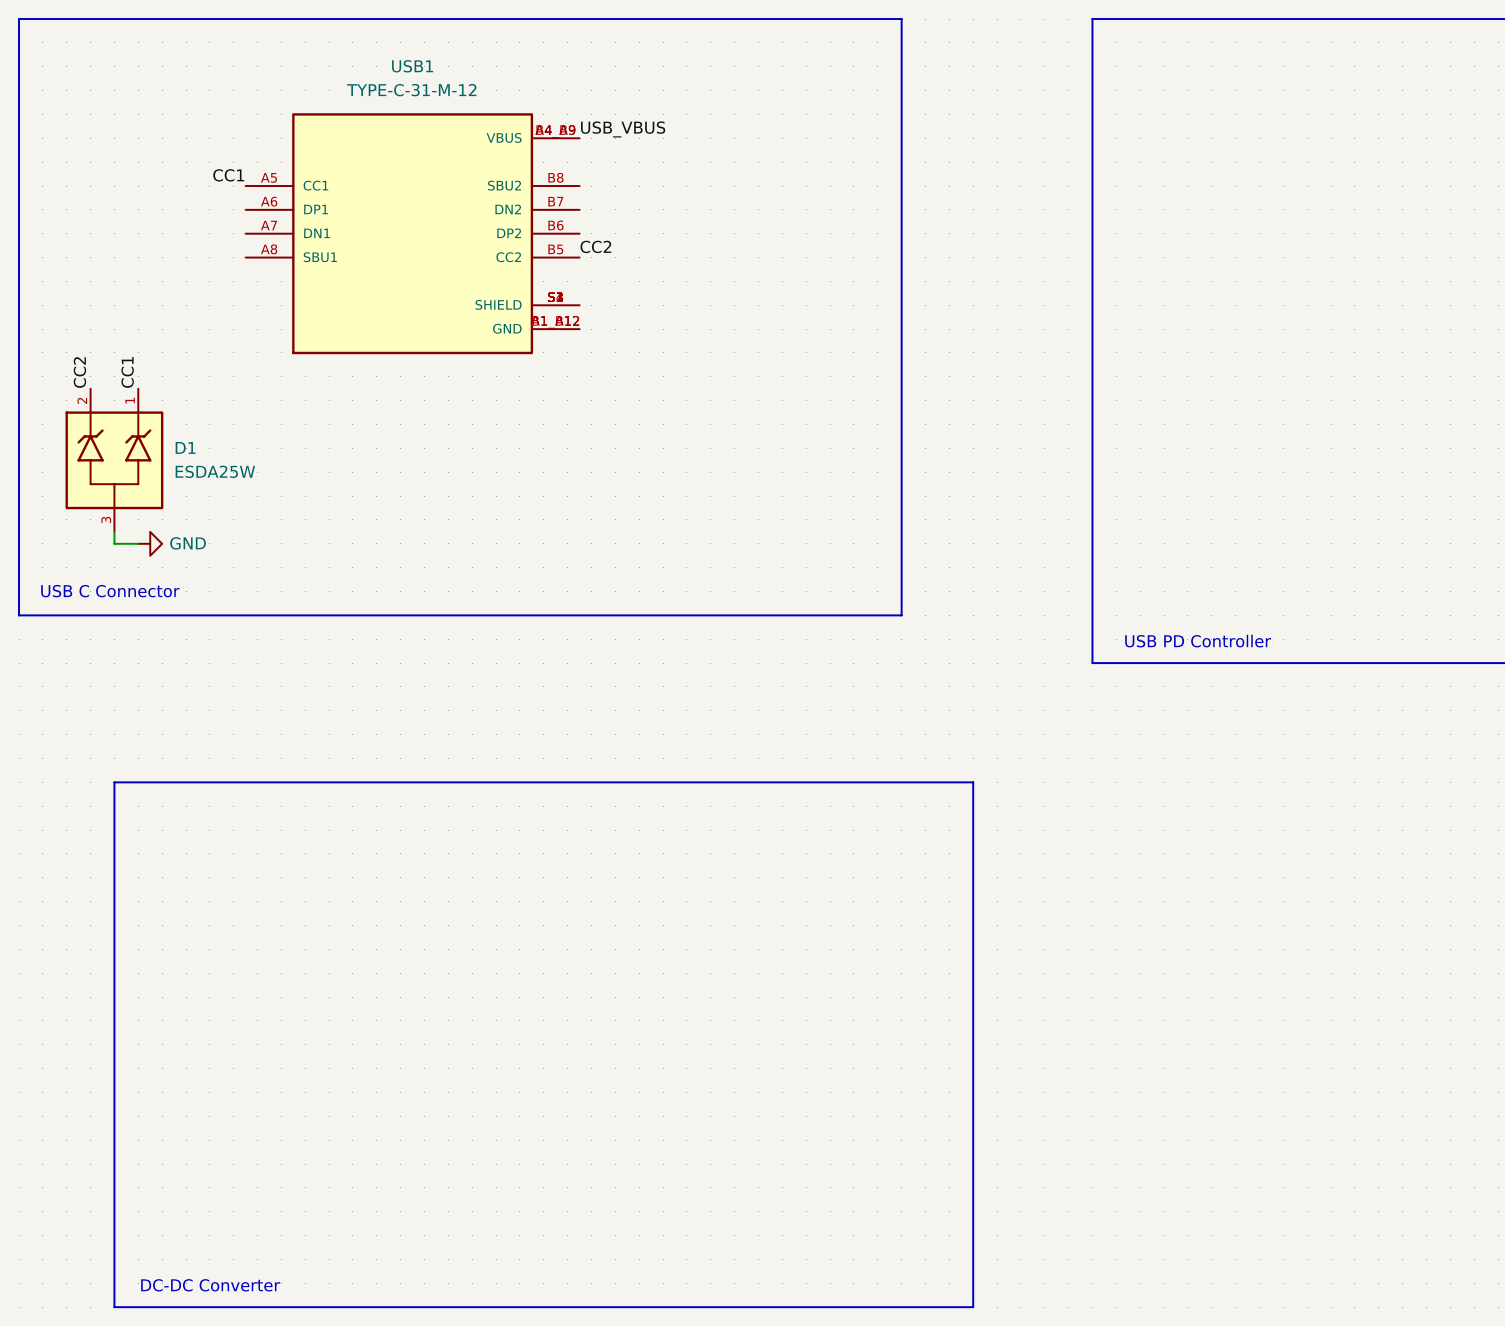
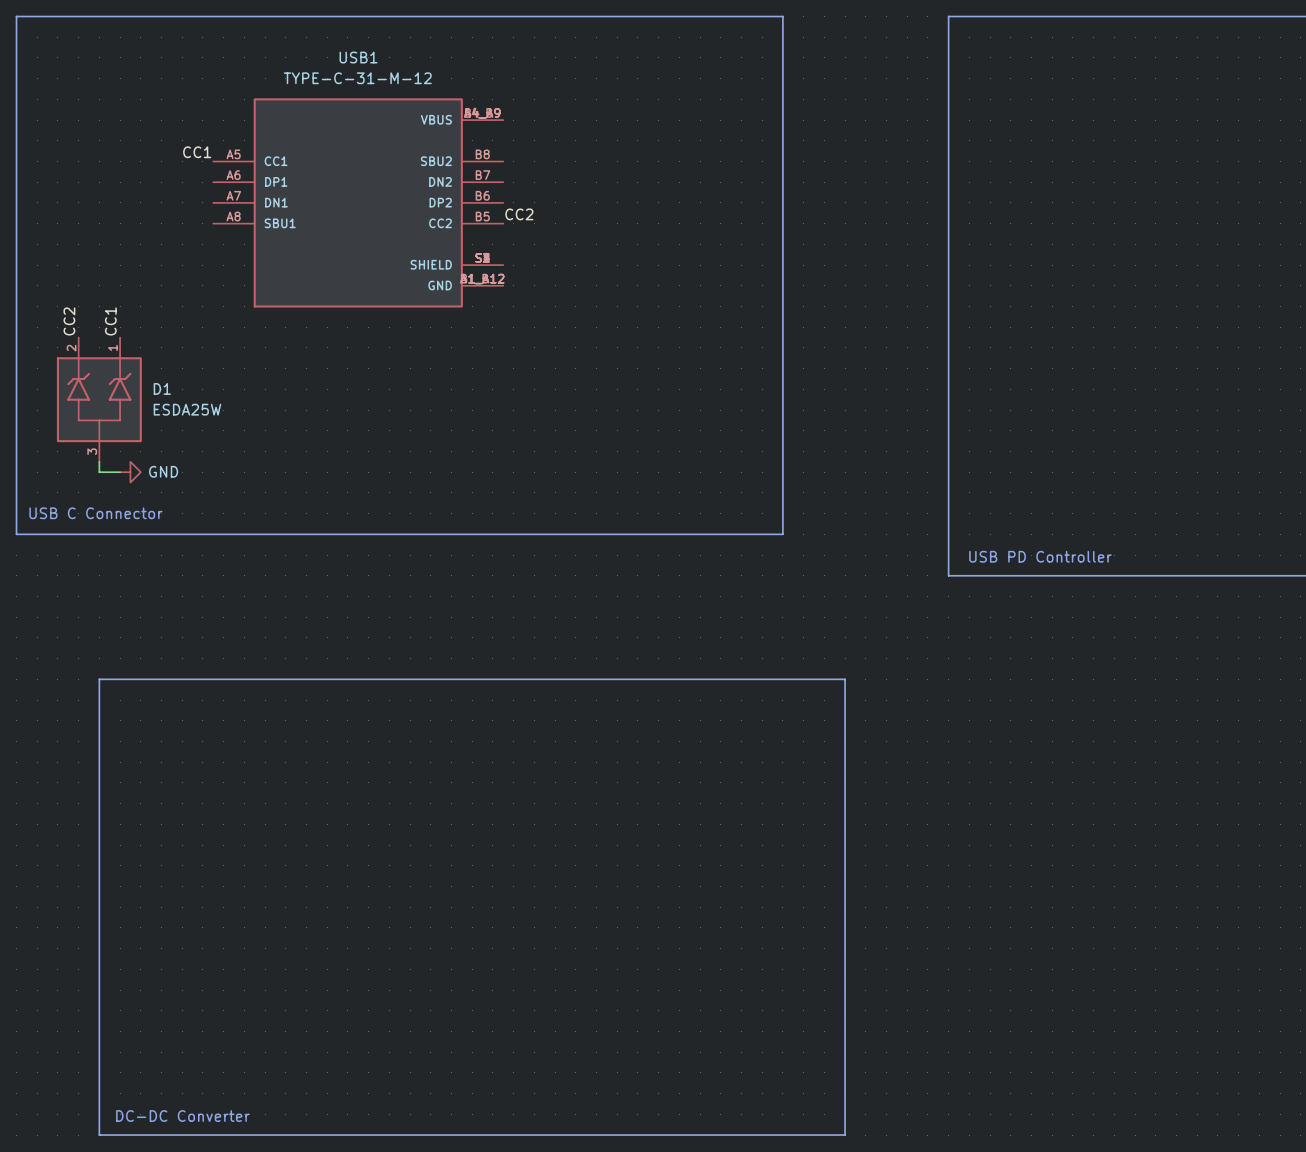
label: USB_VBUS (623, 129) -> none

